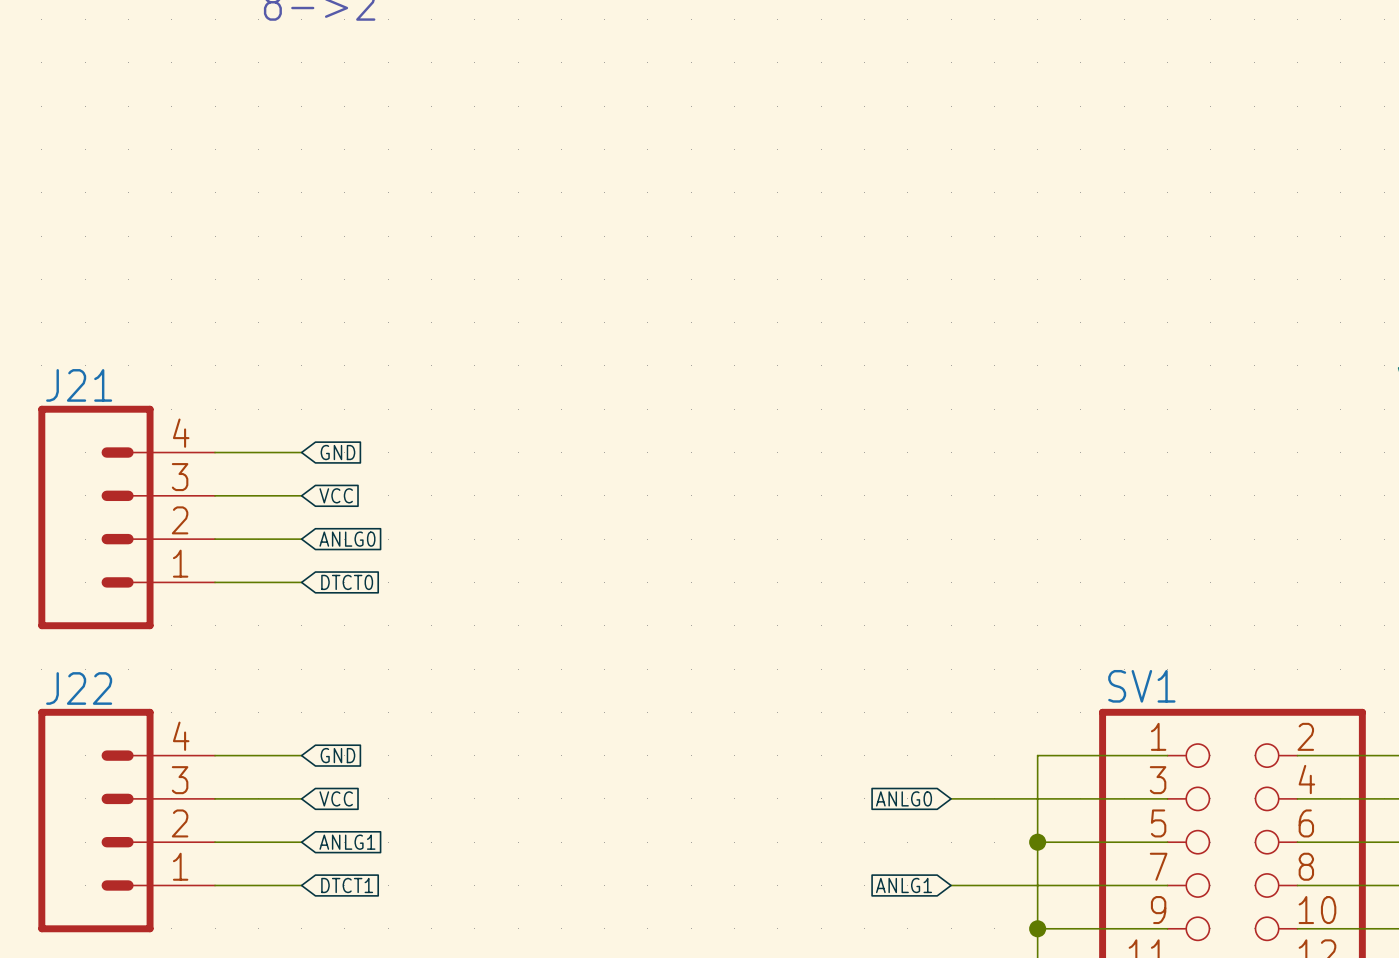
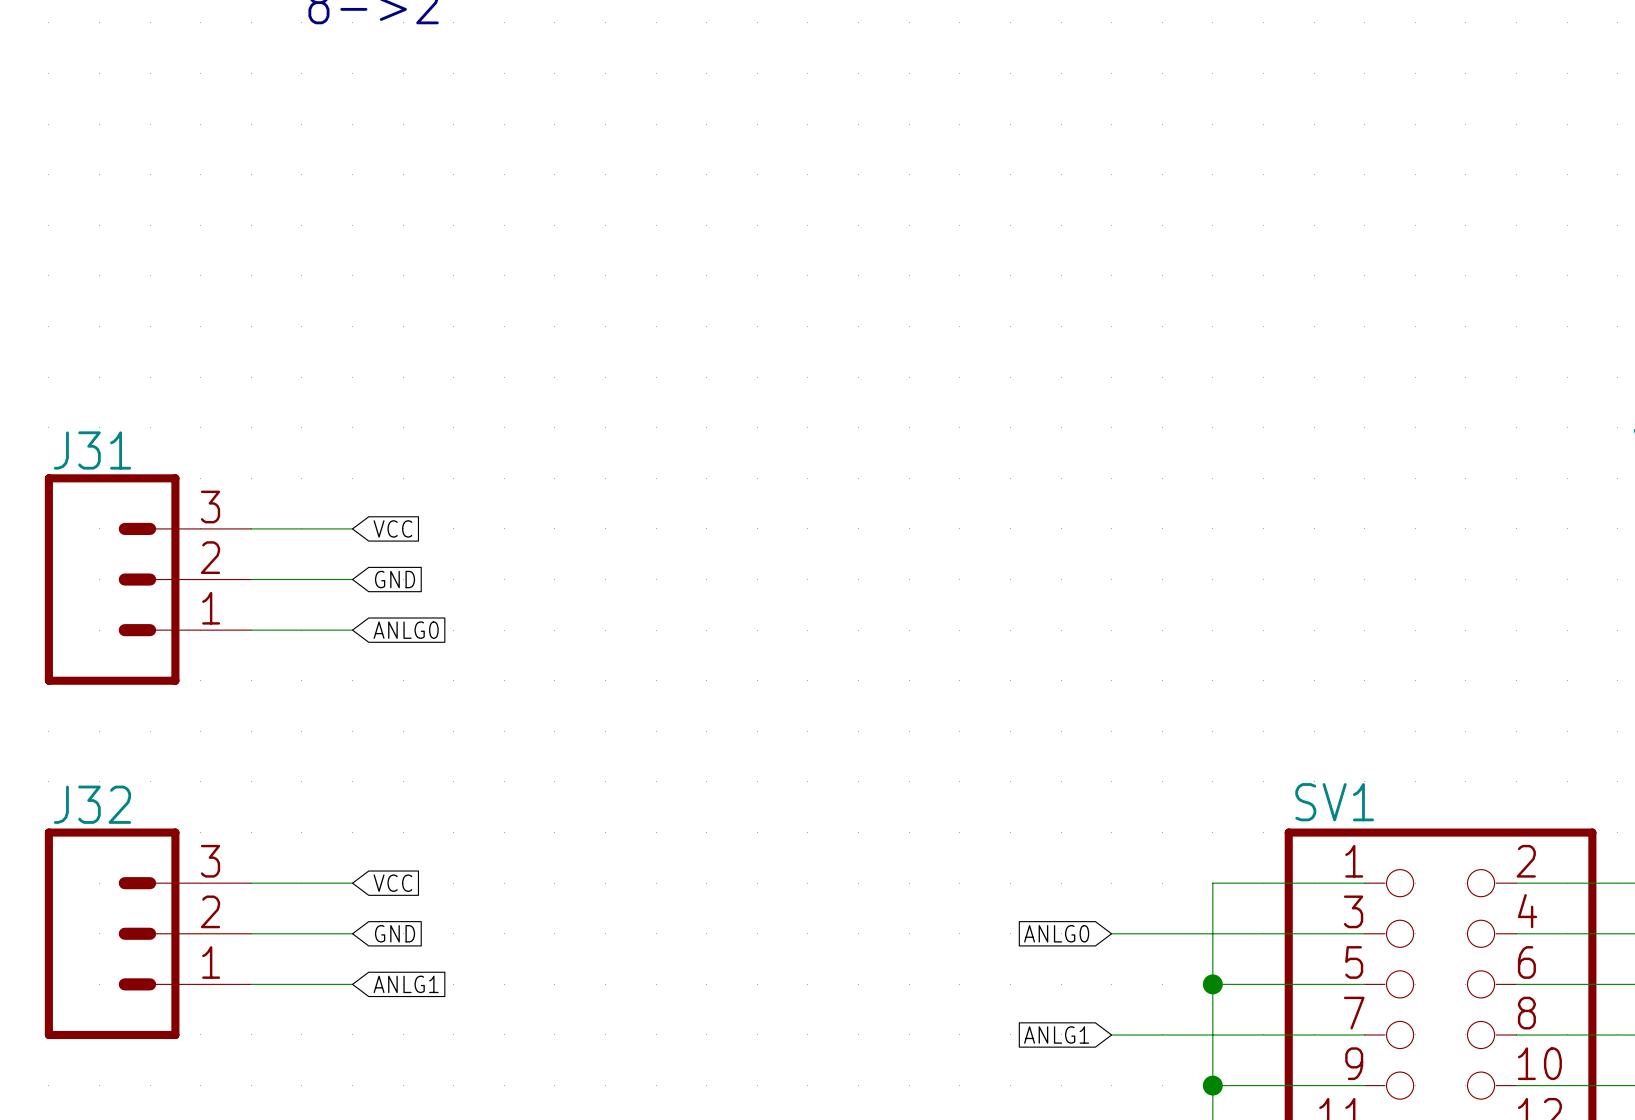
global label: GND (337, 452) -> VCC (392, 528)
J31: none -> (148, 579)
global label: VCC (336, 495) -> GND (395, 579)
J21: (126, 517) -> none
wire: (215, 582) (301, 582) -> none
global label: DTCT0 (347, 582) -> none
global label: GND (337, 755) -> VCC (392, 883)
J32: none -> (148, 933)
global label: VCC (336, 798) -> GND (395, 933)
J22: (126, 820) -> none
wire: (215, 885) (301, 885) -> none
global label: DTCT1 (347, 885) -> none

